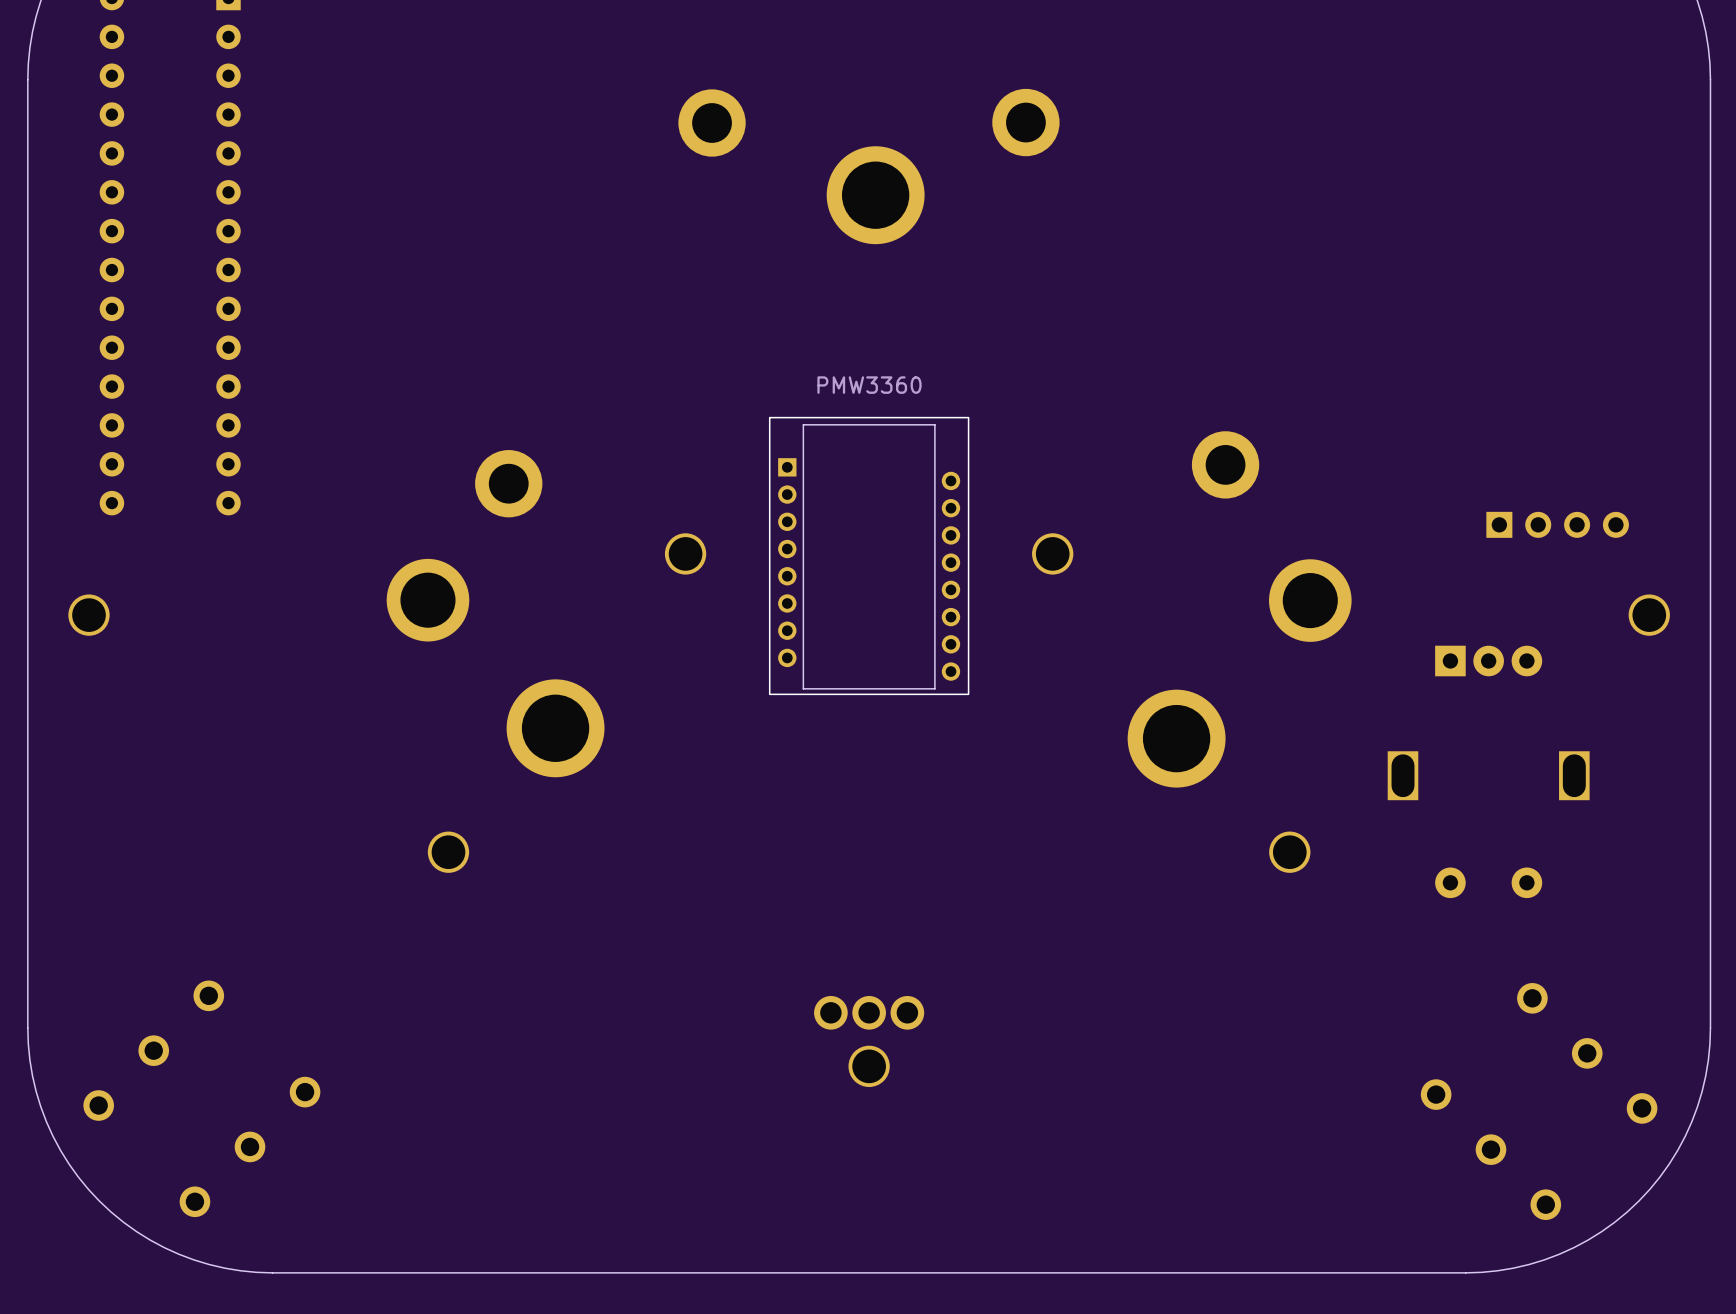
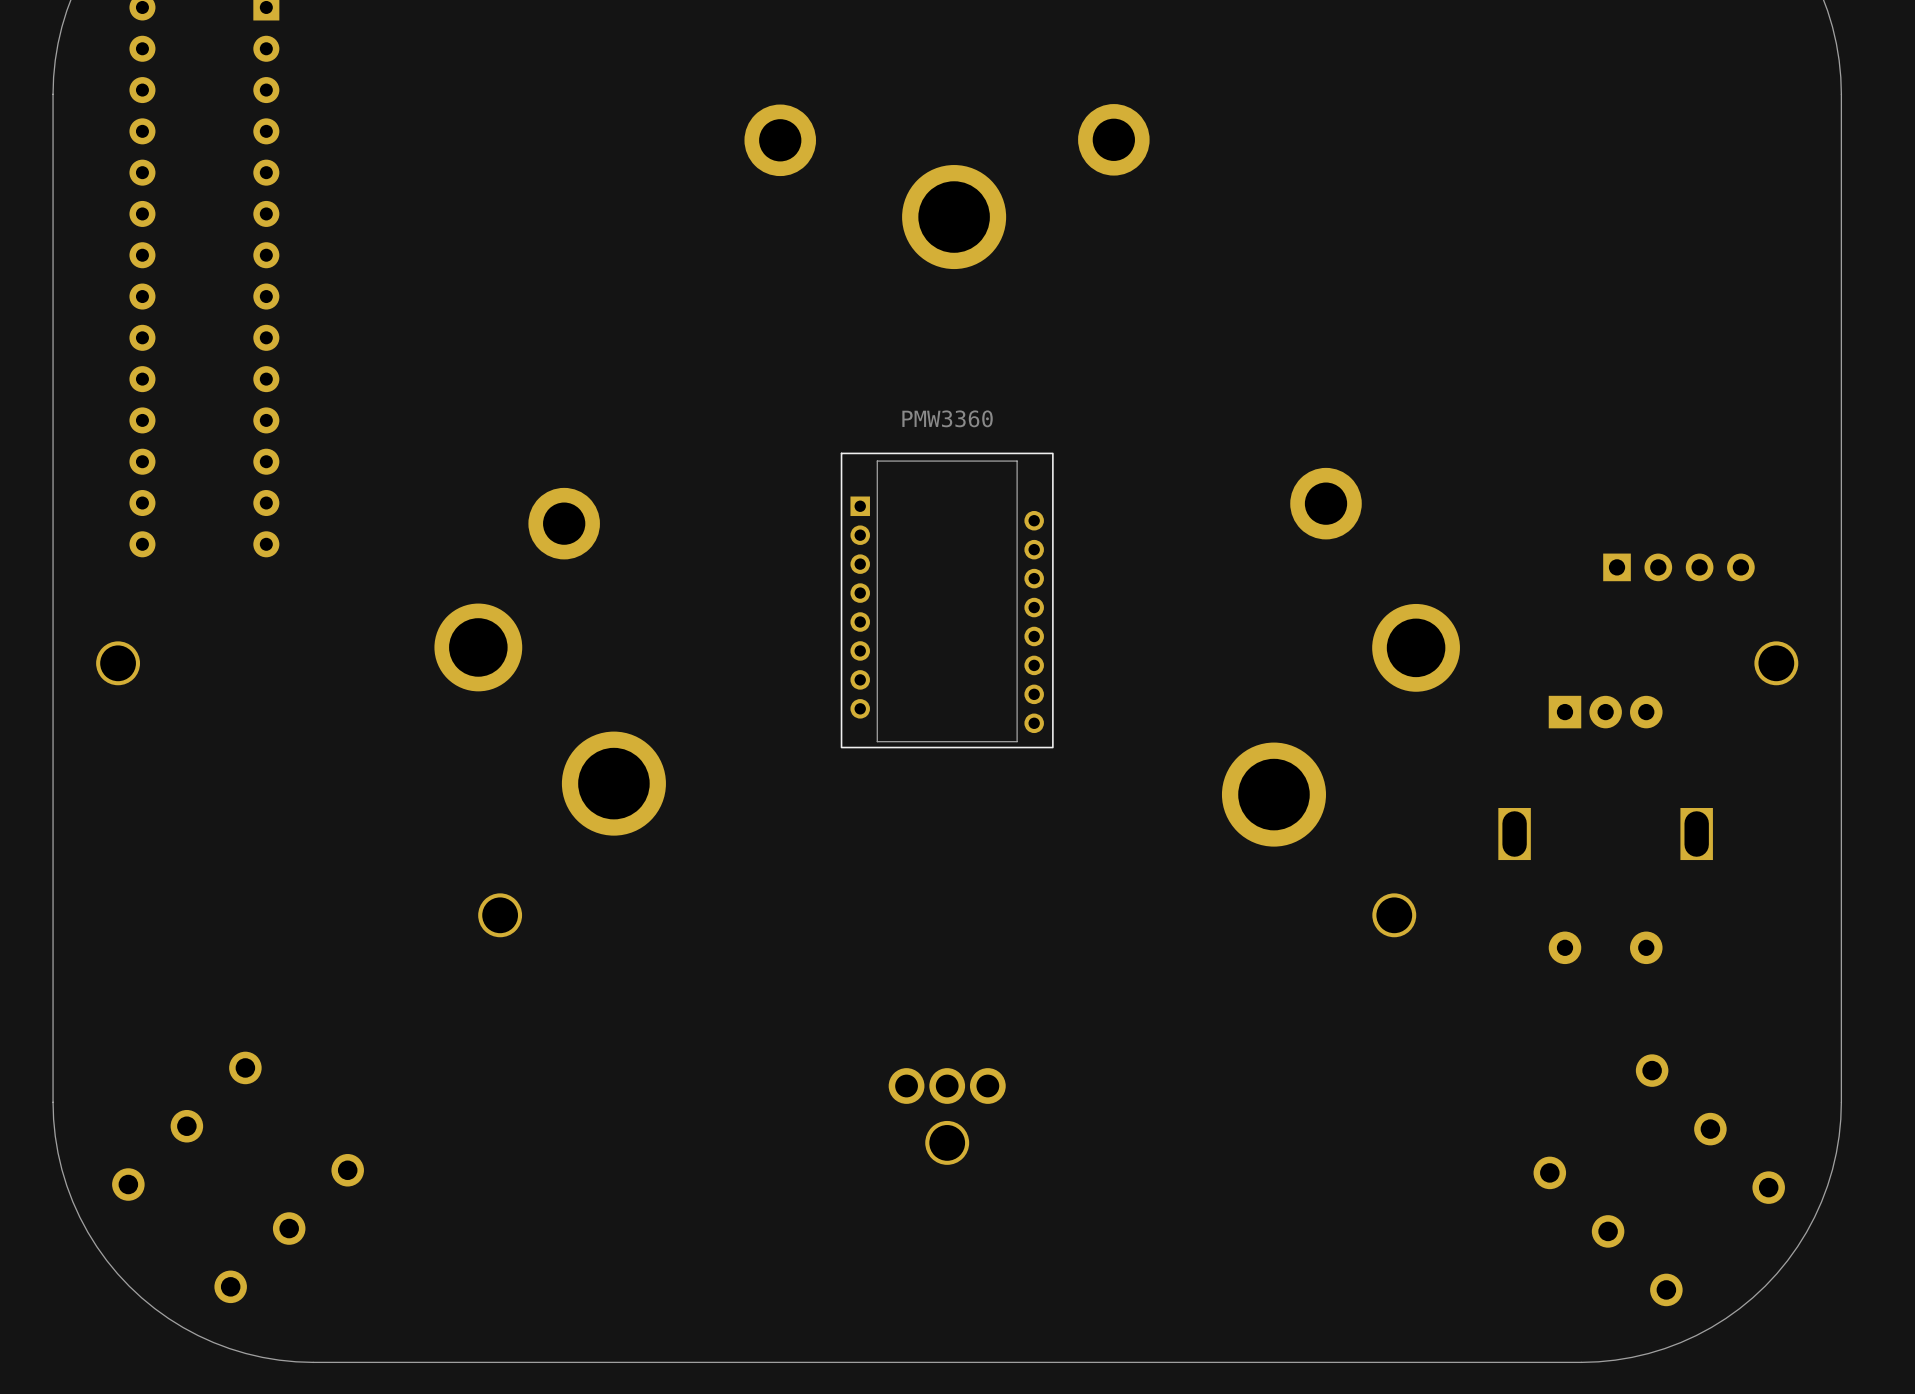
part: (685, 553) -> none
part: (1052, 553) -> none

